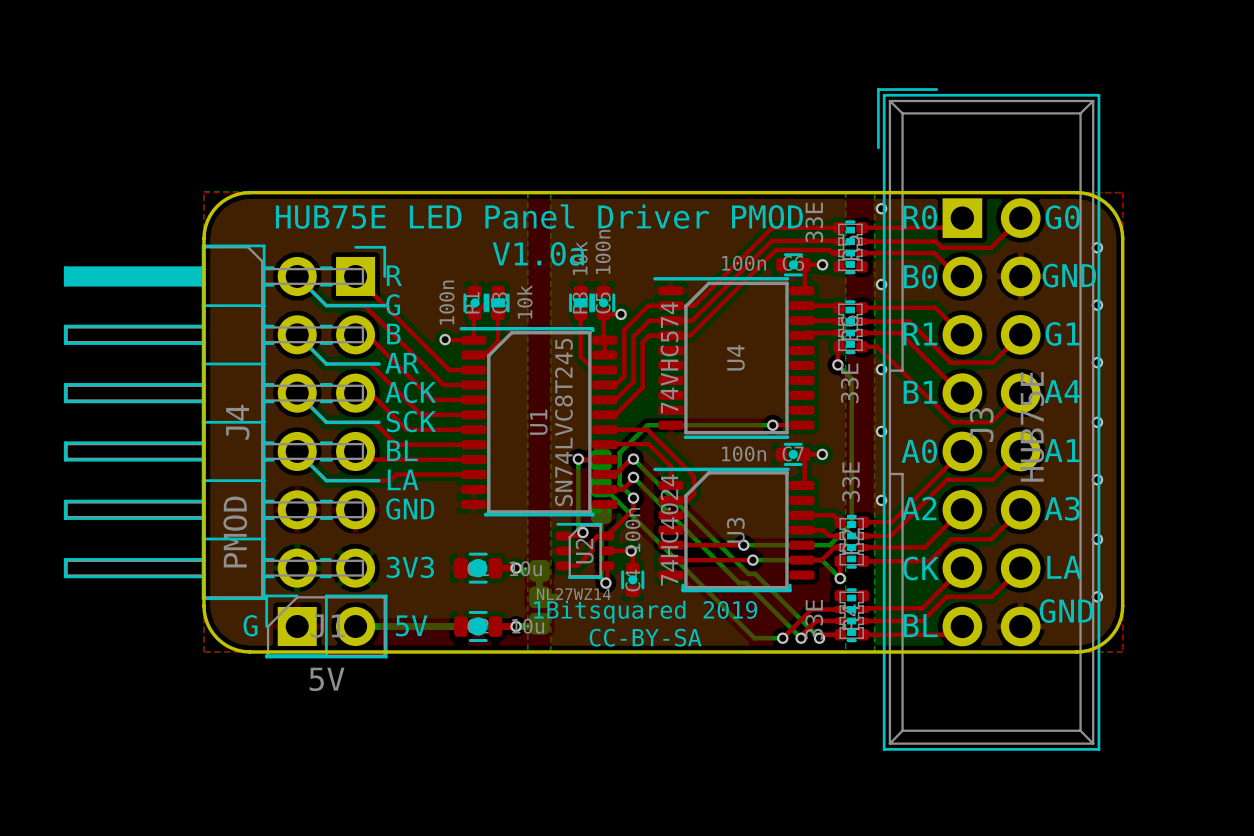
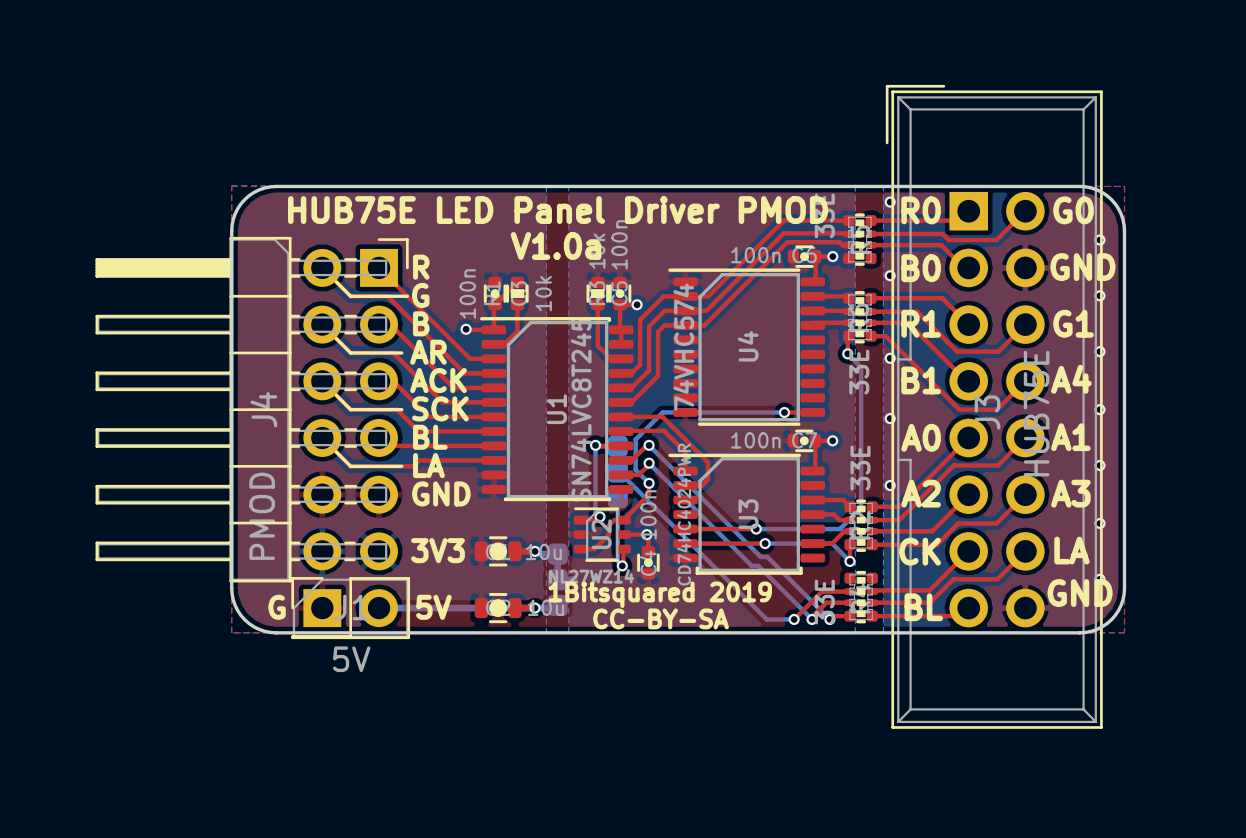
U3 value: 74HC4024 (669, 530) -> CD74HC4024PWR (684, 514)

